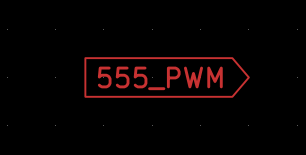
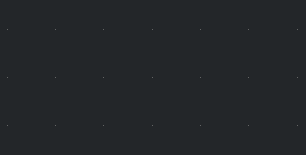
global label: 555_PWM (160, 78) -> none

